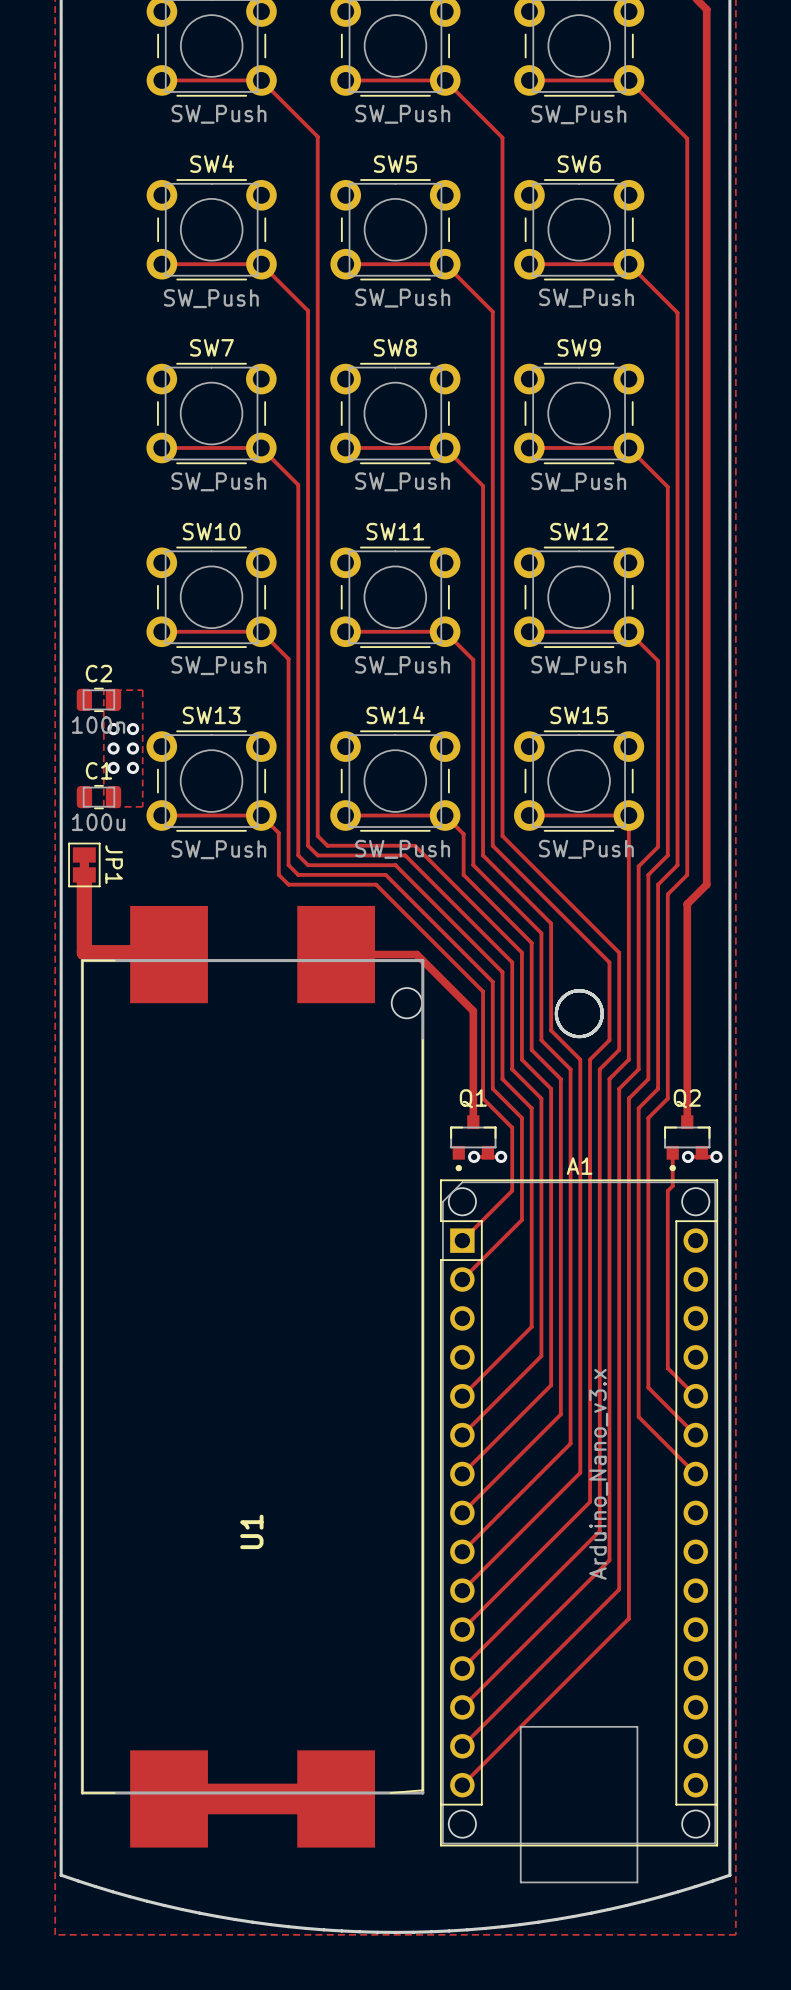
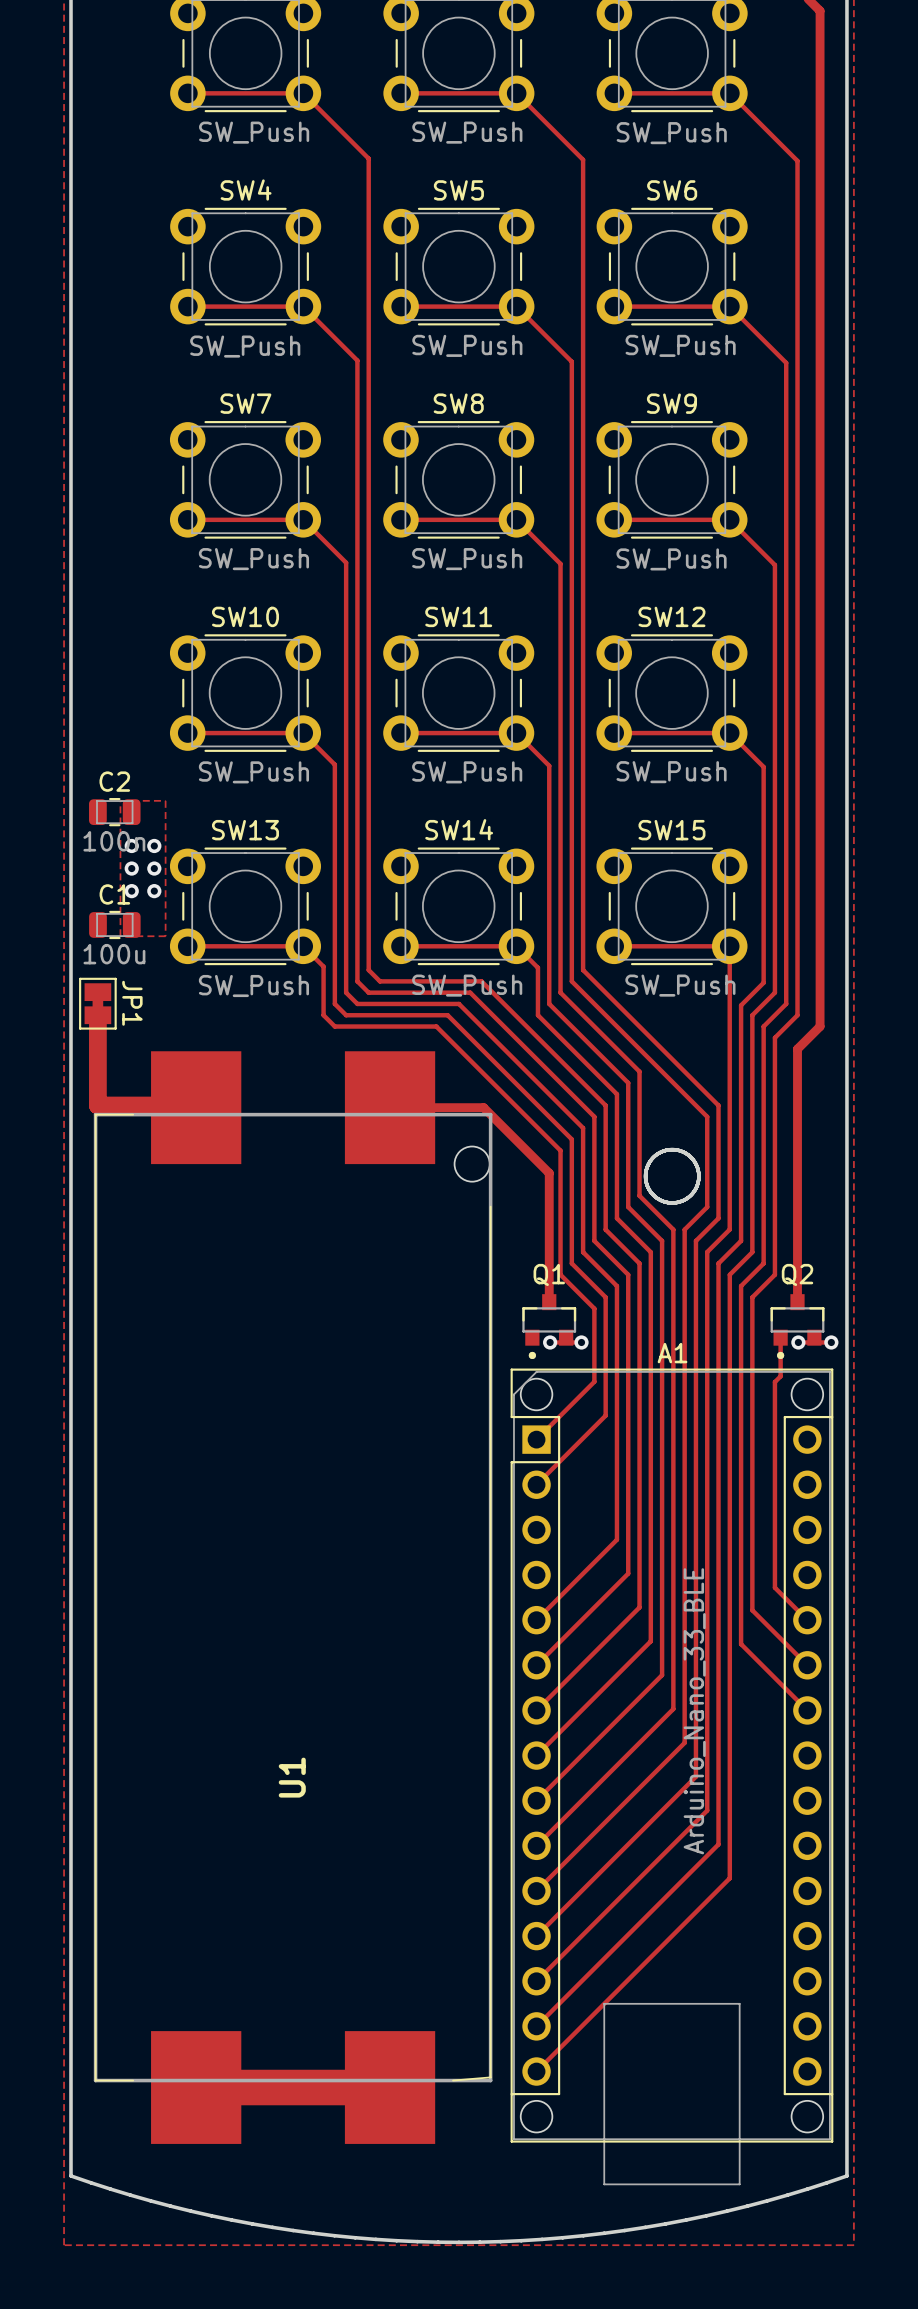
A1 value: Arduino_Nano_v3.x (598, 1474) -> Arduino_Nano_33_BLE (694, 1711)

